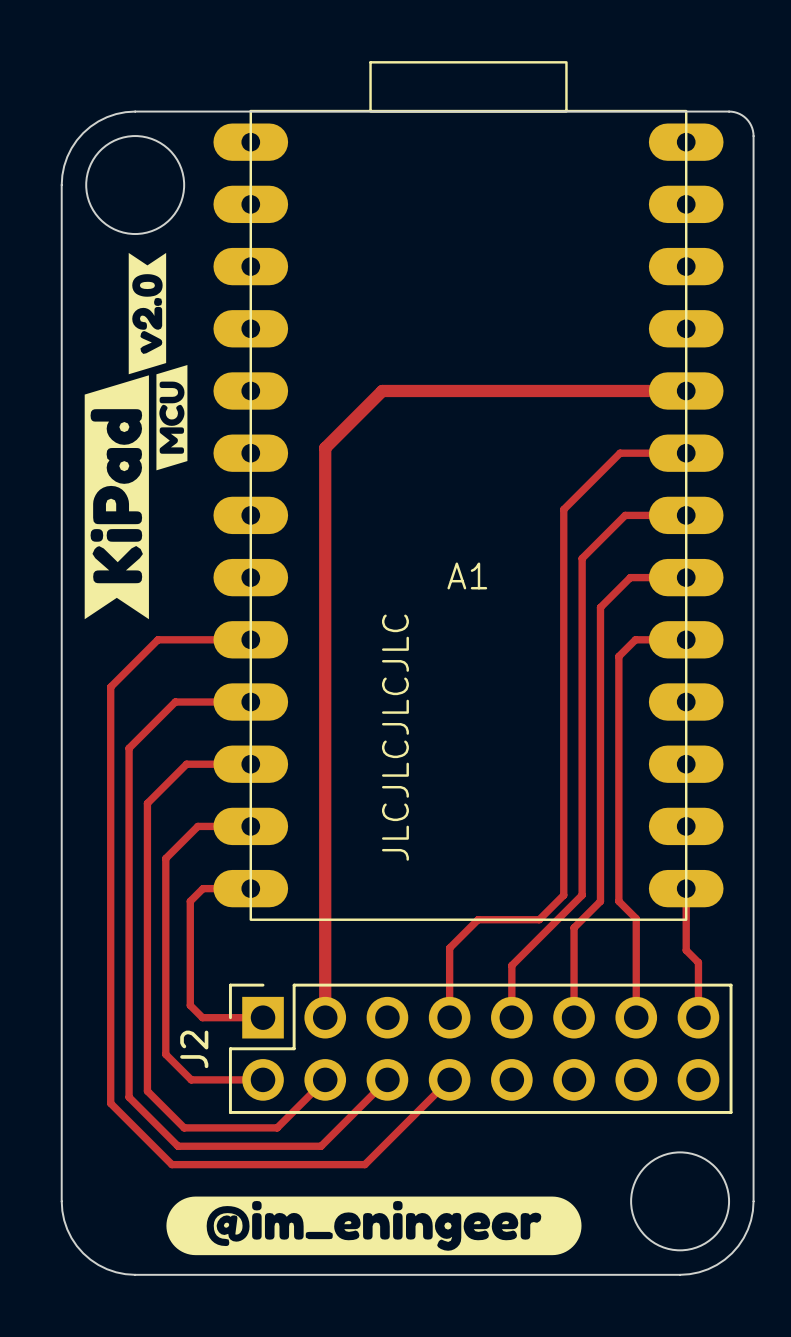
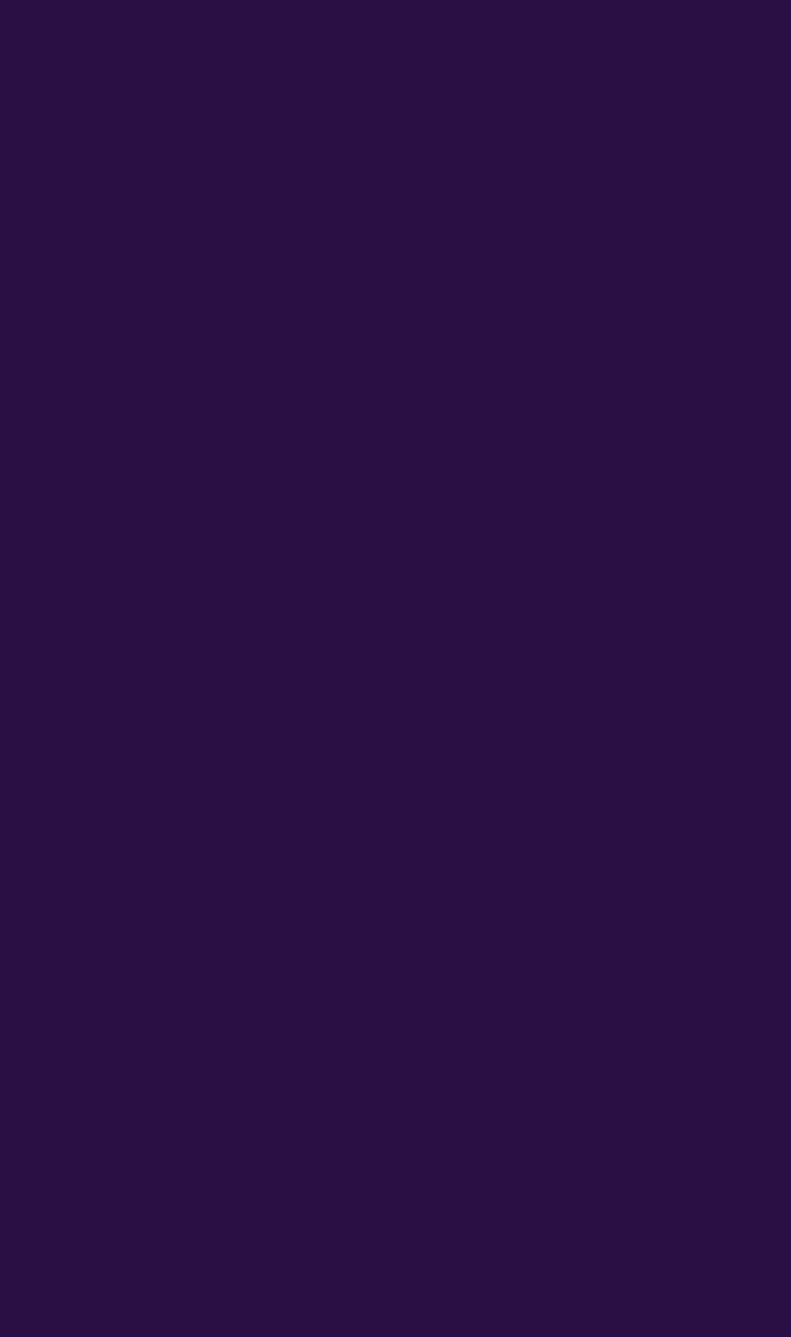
board edge: (135, 111) (729, 111) (742, 115) (751, 125) (753, 136) (753, 1201) (751, 1220) (743, 1238) (732, 1253) (716, 1264) (699, 1272) (680, 1274) (135, 1274) (116, 1272) (98, 1264) (83, 1253) (71, 1238) (64, 1220) (61, 1201) (61, 185) (67, 156) (83, 133) (107, 117) (135, 111) -> none
round board edge: [85, 135, 185, 235] -> none
drawing: [84, 252, 188, 620] -> none
track: (686, 390) (382, 390) (325, 448) (325, 1017) -> none
track: (686, 453) (620, 453) (563, 509) (563, 895) (539, 919) (478, 919) (449, 948) (449, 1017) -> none
A1: (468, 491) -> none
track: (686, 515) (625, 515) (582, 558) (582, 895) (511, 965) (511, 1017) -> none
track: (686, 577) (630, 577) (600, 607) (600, 901) (574, 927) (574, 1017) -> none
track: (250, 639) (157, 639) (110, 687) (110, 1103) (171, 1164) (364, 1164) (449, 1079) -> none
track: (686, 639) (635, 639) (618, 656) (618, 901) (636, 918) (636, 1017) -> none
track: (250, 702) (175, 702) (129, 748) (129, 1097) (178, 1146) (321, 1146) (387, 1079) -> none
text: JLCJLCJLCJLC (395, 737) -> none
track: (250, 764) (186, 764) (147, 803) (147, 1091) (184, 1127) (277, 1127) (325, 1079) -> none
track: (250, 826) (197, 826) (165, 858) (165, 1054) (191, 1079) (263, 1079) -> none
track: (250, 888) (203, 888) (190, 901) (190, 1005) (202, 1017) (263, 1017) -> none
track: (686, 888) (686, 950) (698, 962) (698, 1017) -> none
J2: (480, 1048) -> none
round board edge: [630, 1151, 730, 1251] -> none
drawing: [166, 1196, 582, 1256] -> none

